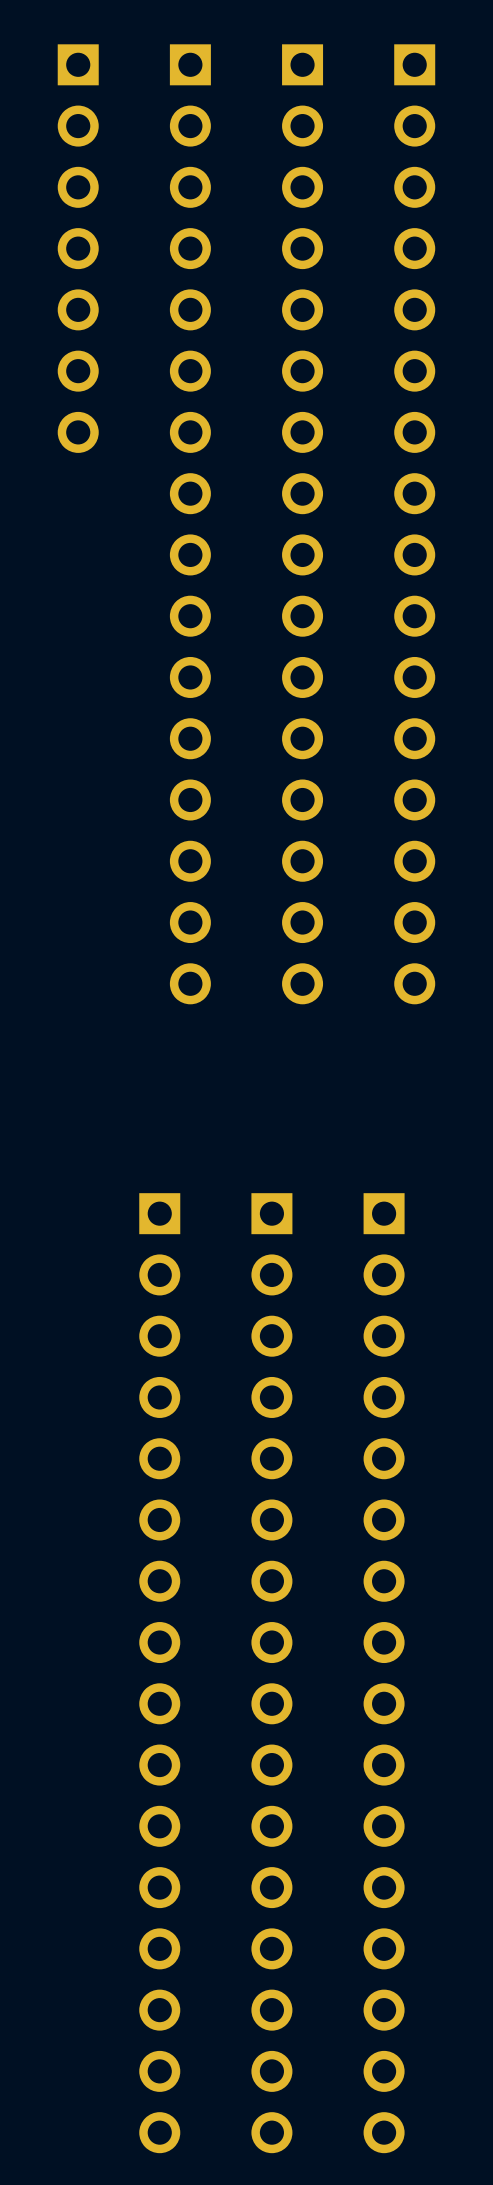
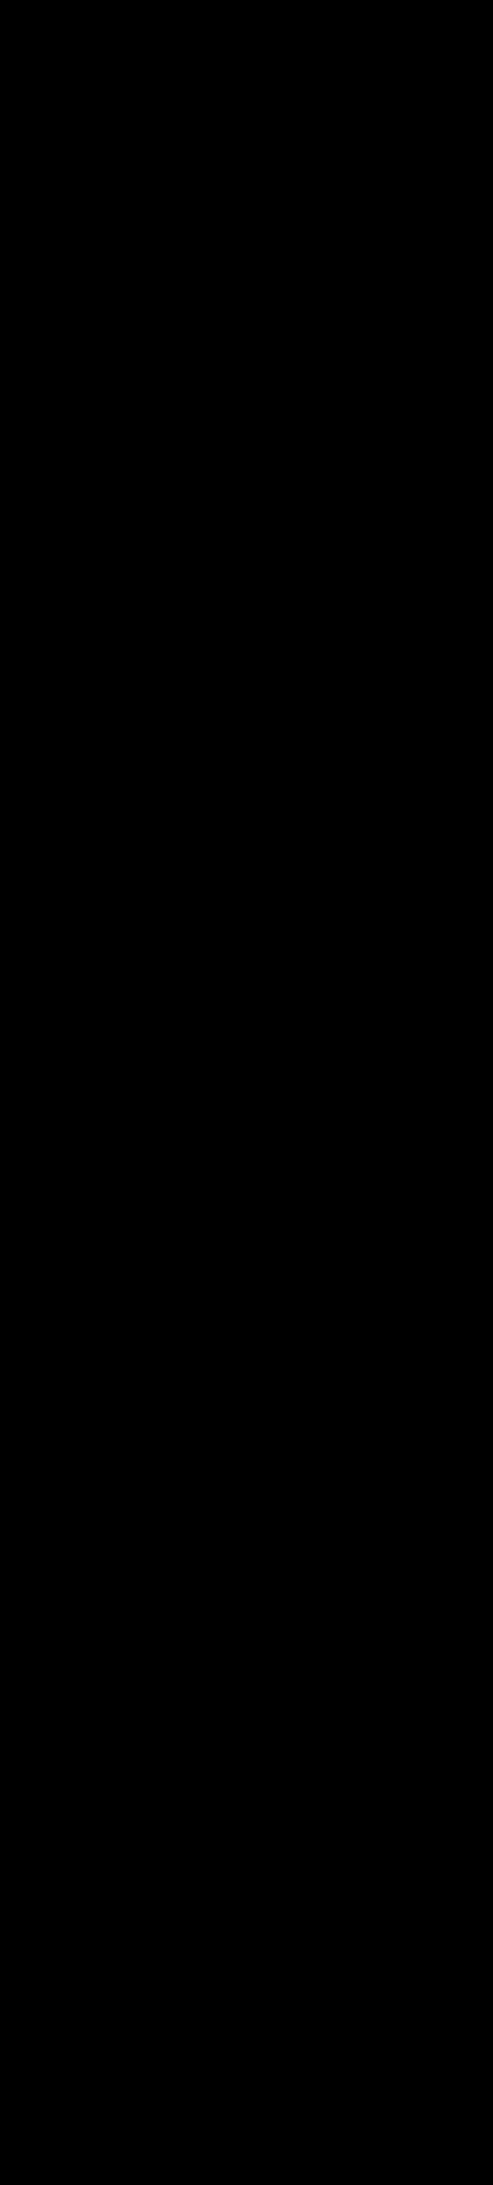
part: (78, 248) -> none
part: (190, 524) -> none
part: (302, 524) -> none
part: (414, 524) -> none
part: (159, 1673) -> none
part: (271, 1673) -> none
part: (384, 1673) -> none

